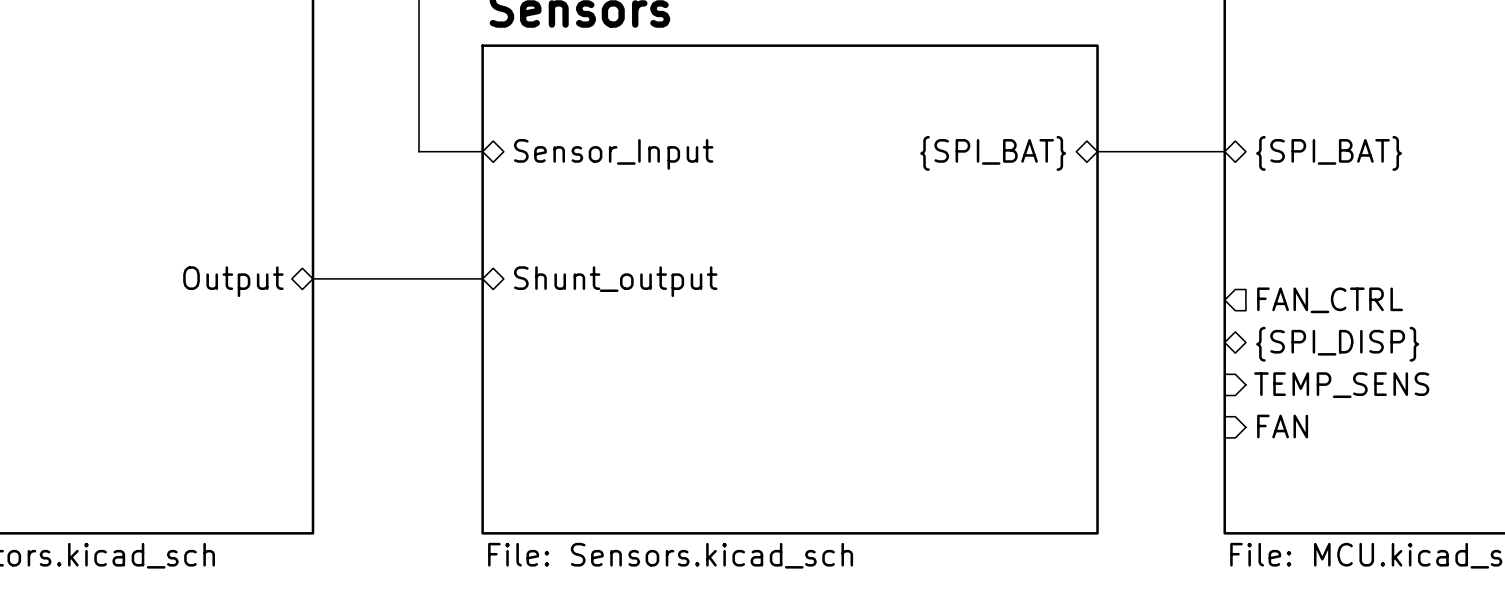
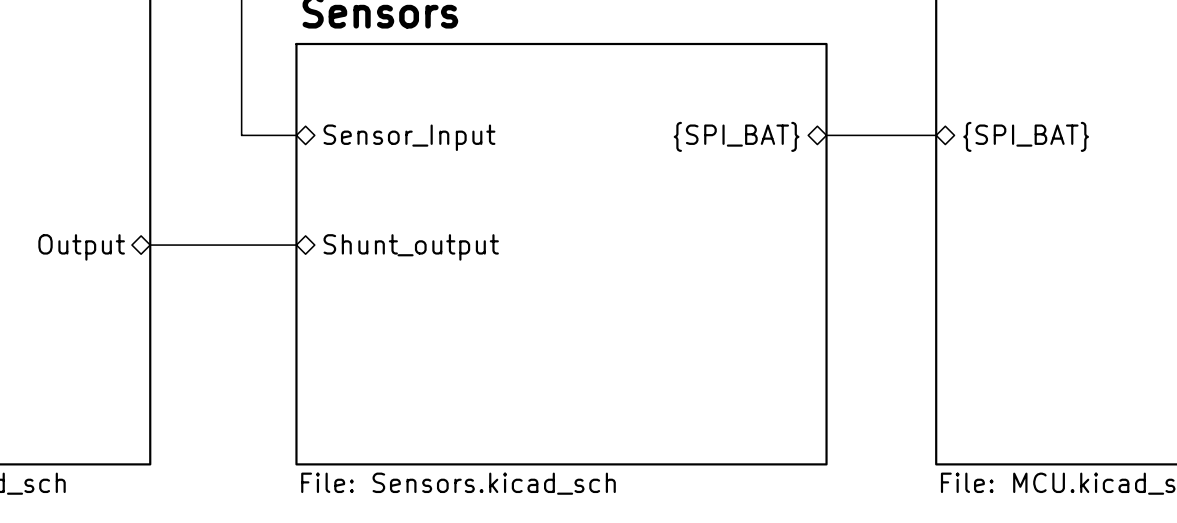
sheet pin: FAN_CTRL (1330, 300) -> none
sheet pin: {SPI_DISP} (1337, 344) -> none
sheet pin: TEMP_SENS (1341, 385) -> none
sheet pin: FAN (1282, 426) -> none

